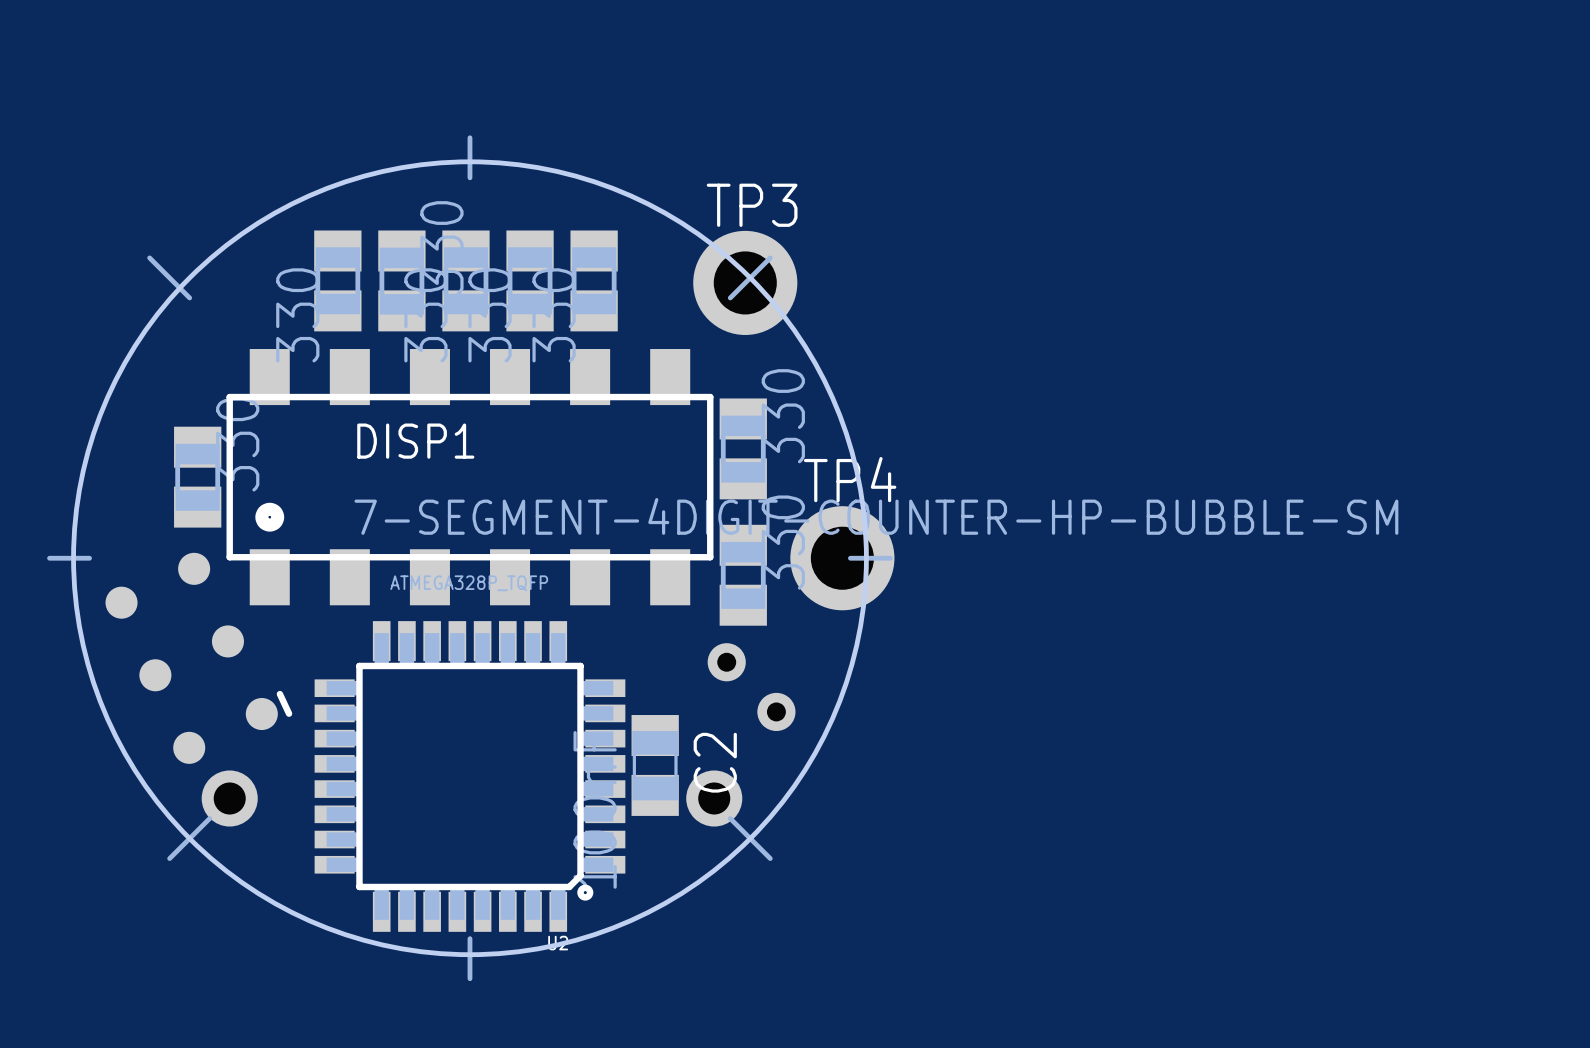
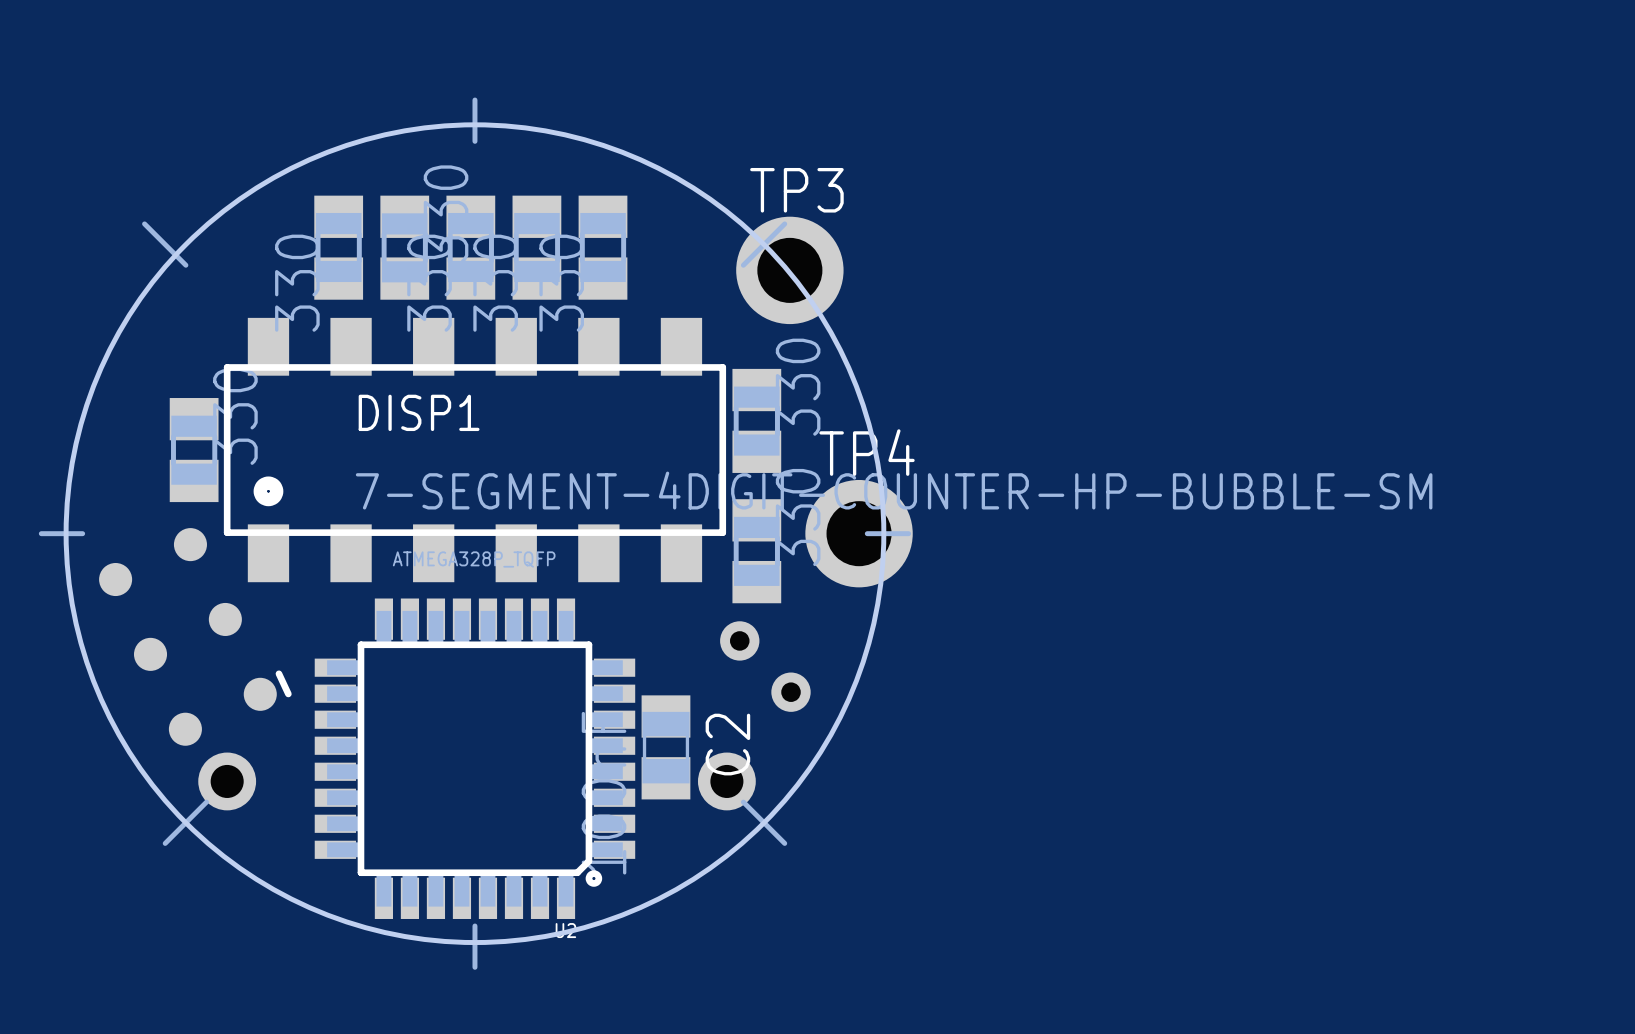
TP3 position: (745, 282) -> (789, 270)

